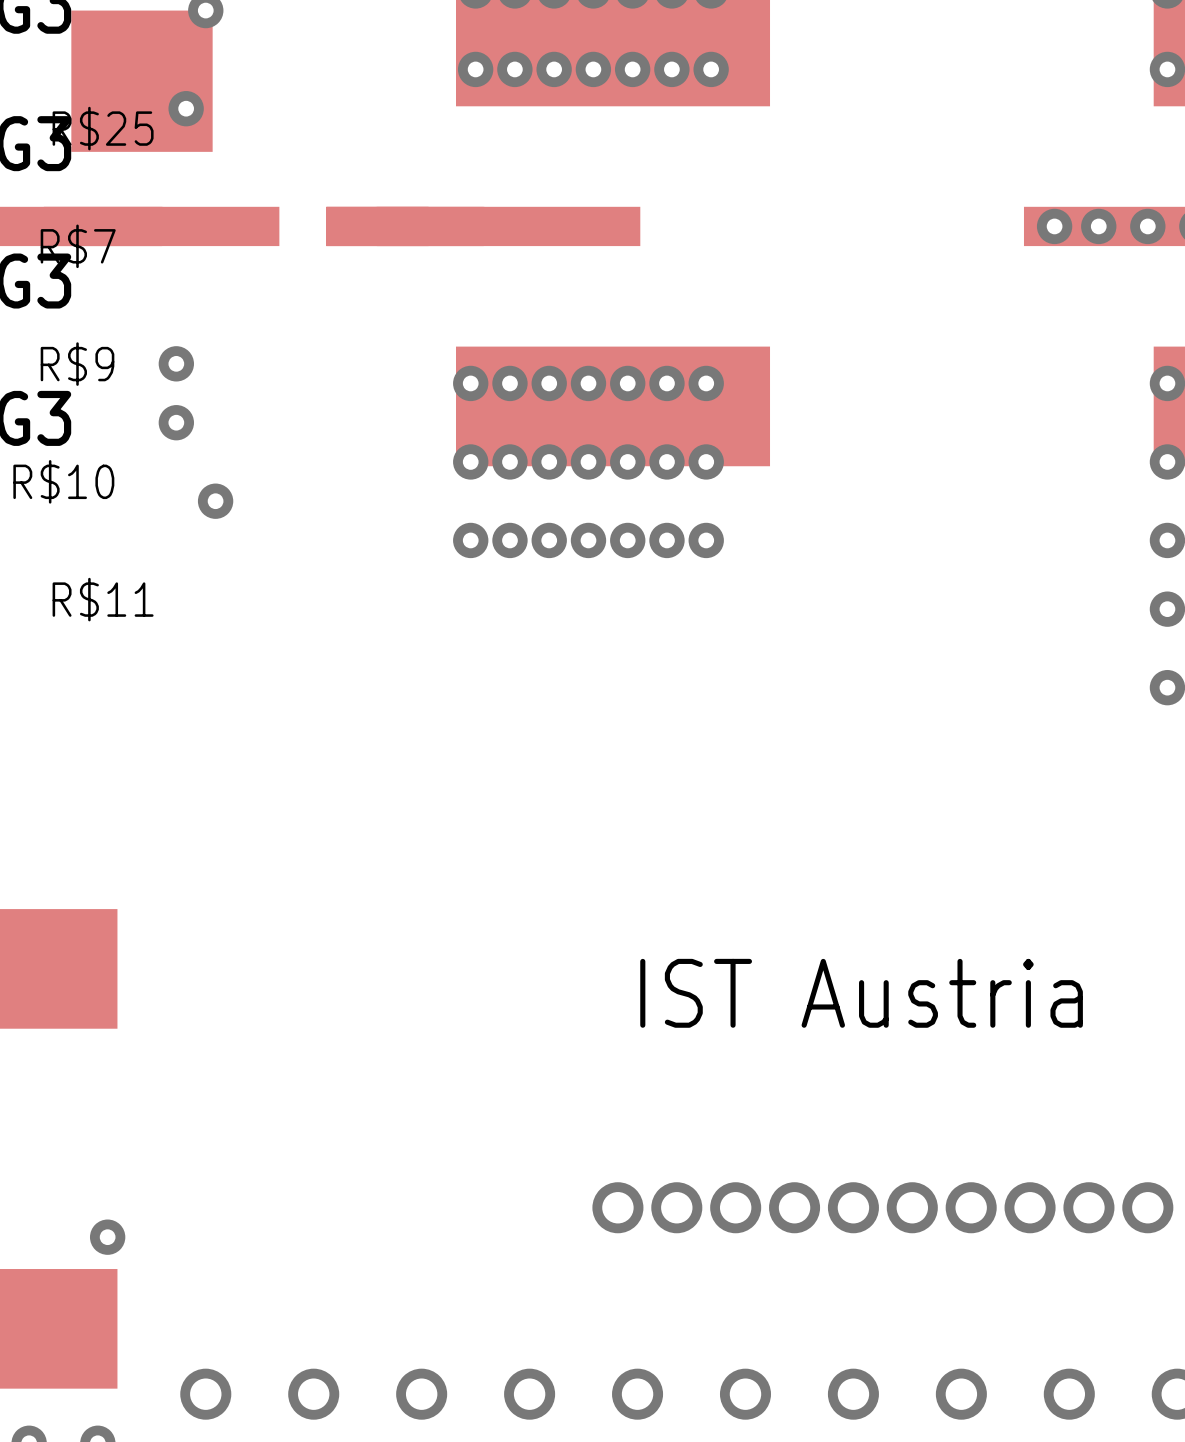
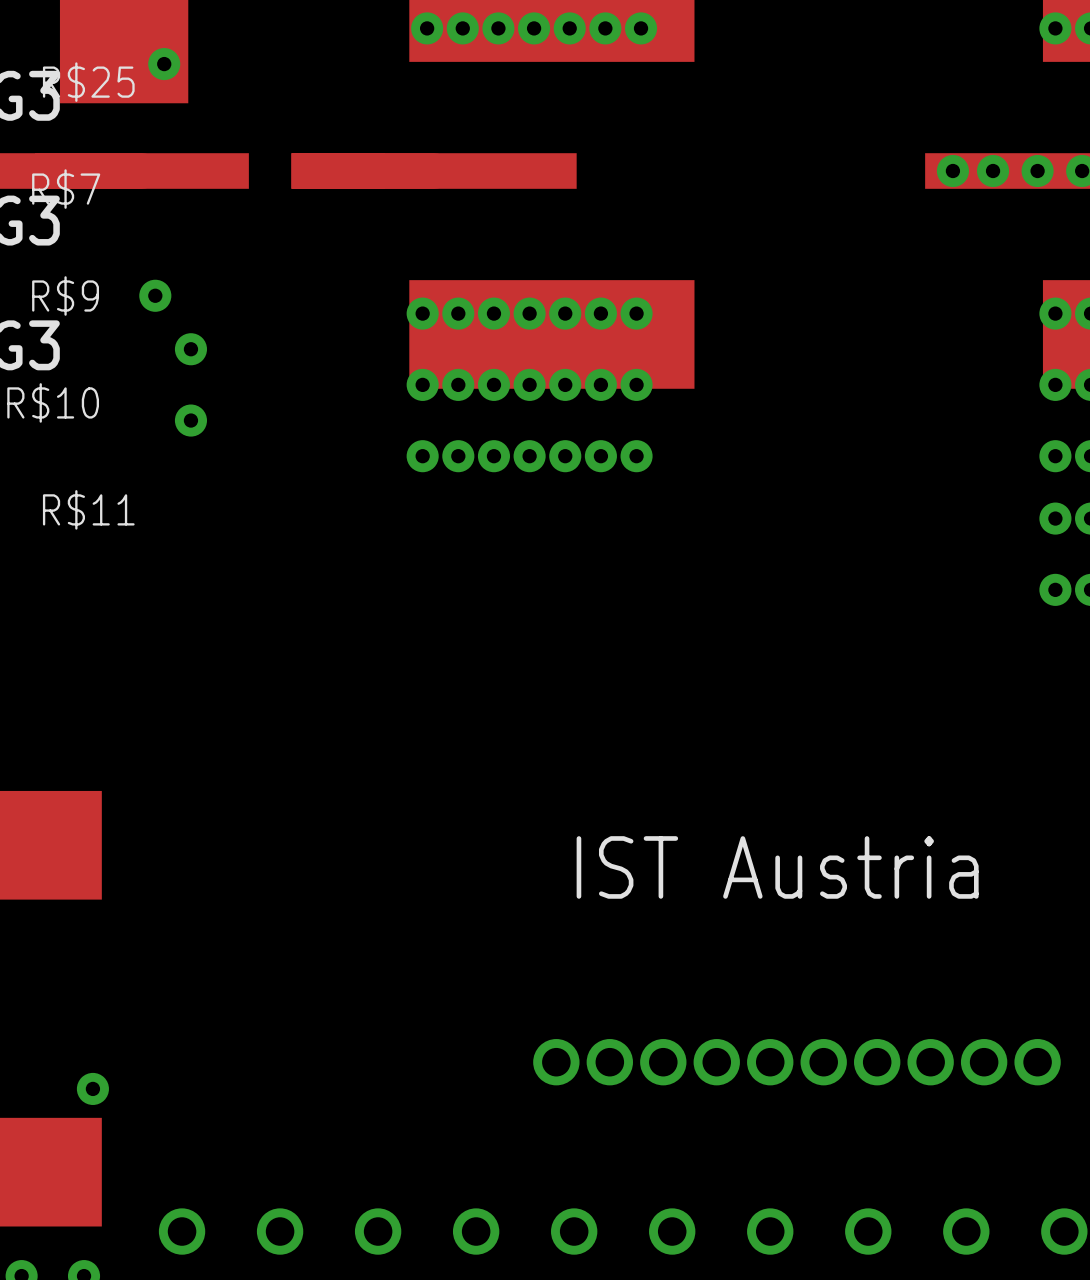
via position: (176, 422) -> (190, 349)

